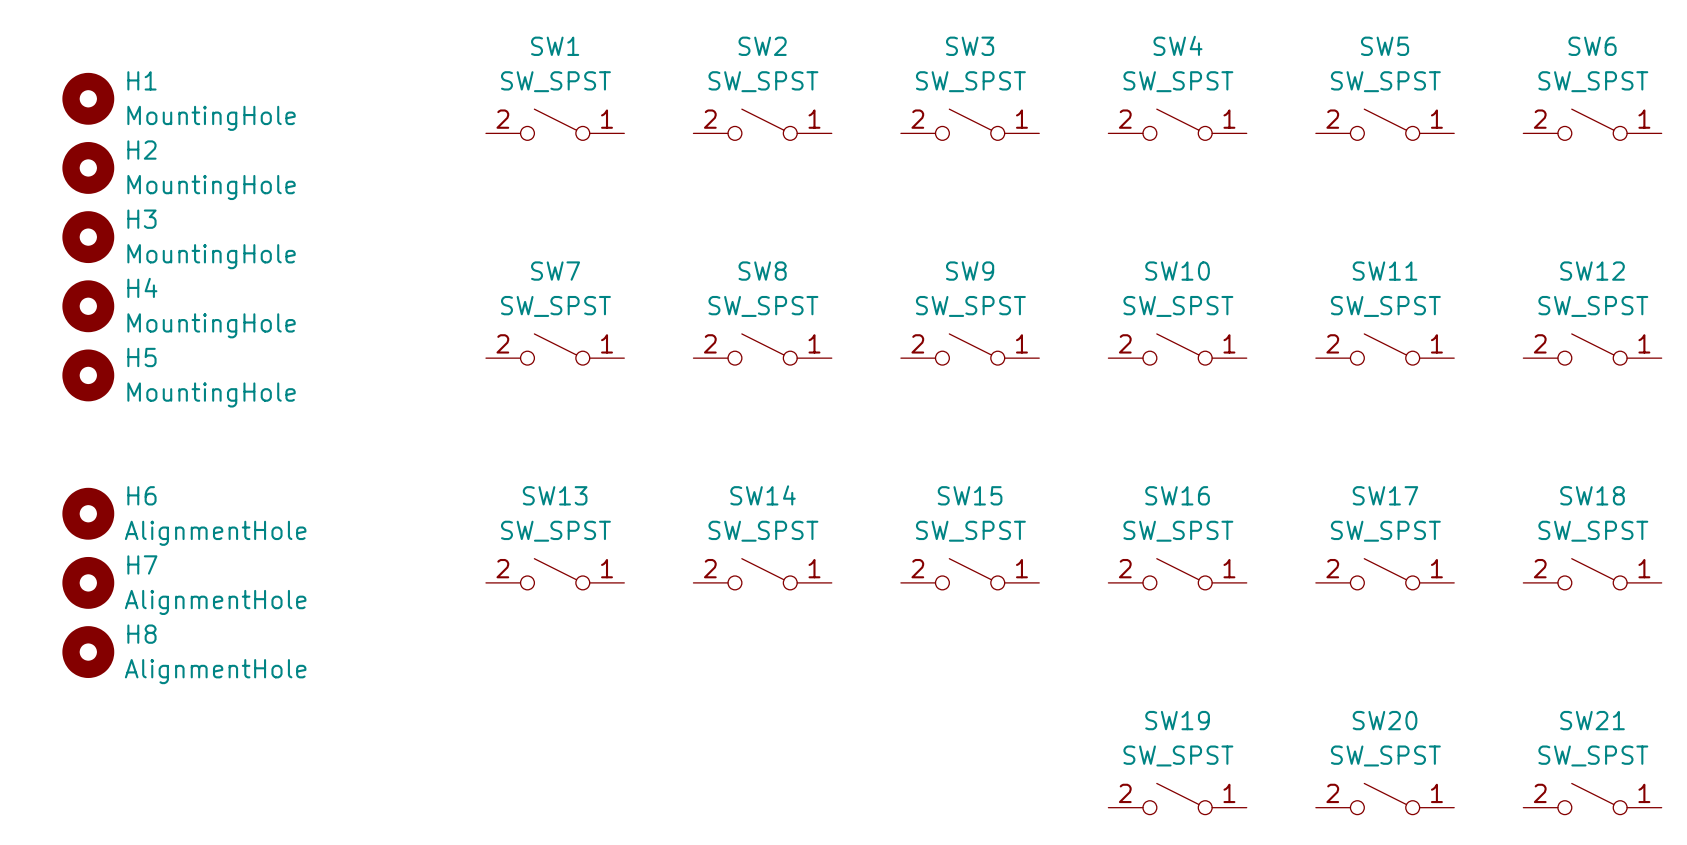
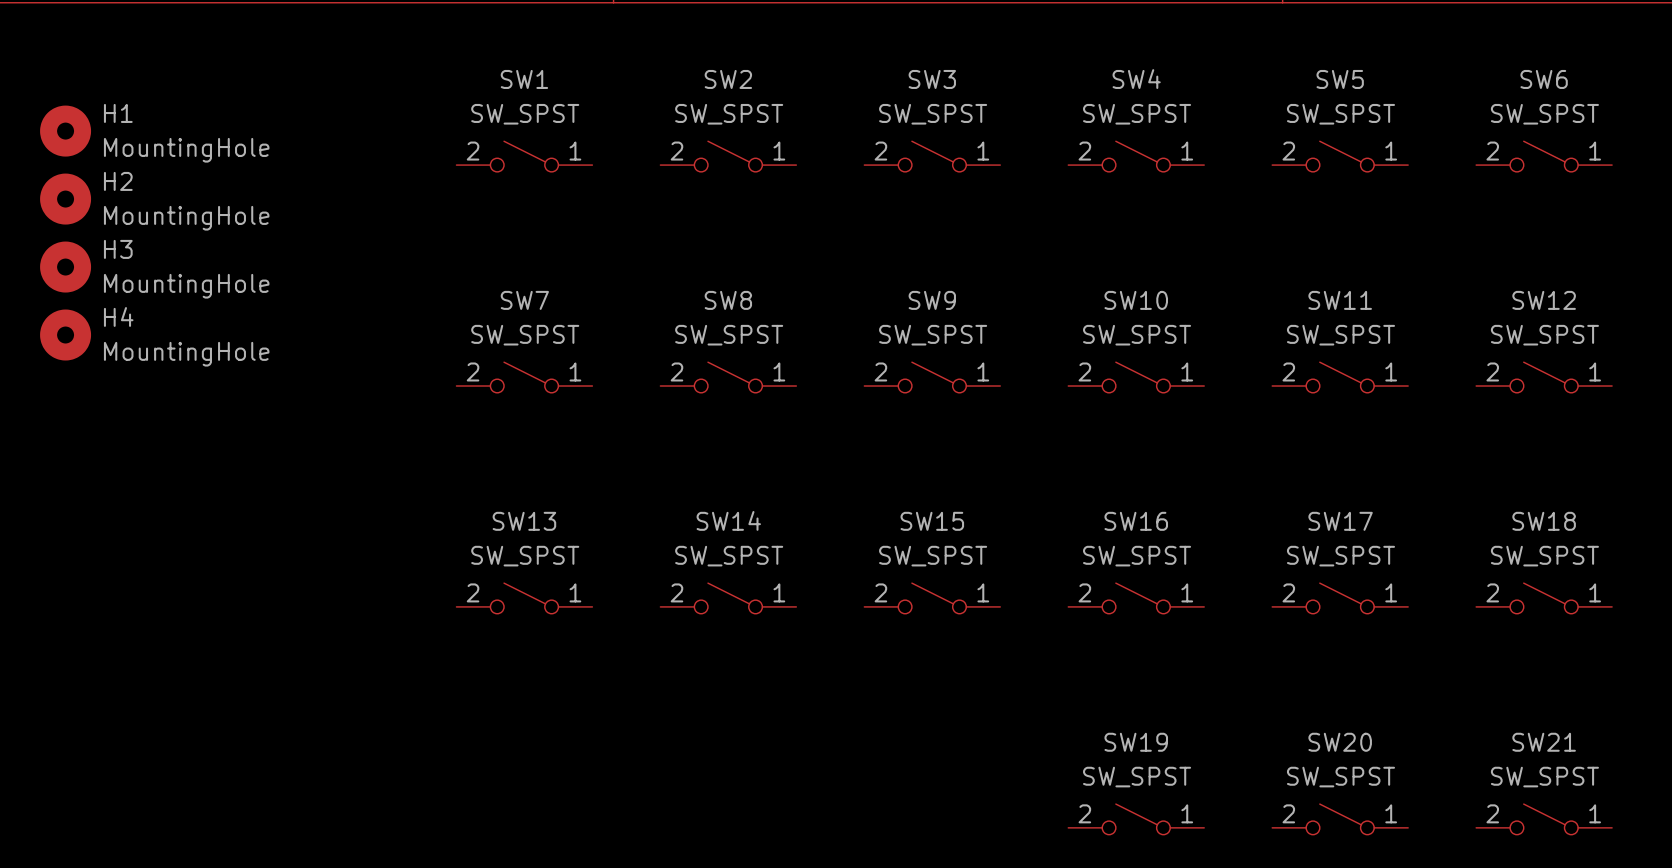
H5: MountingHole (88, 375) -> none
H6: AlignmentHole (88, 513) -> none
H7: AlignmentHole (88, 582) -> none
H8: AlignmentHole (88, 652) -> none

